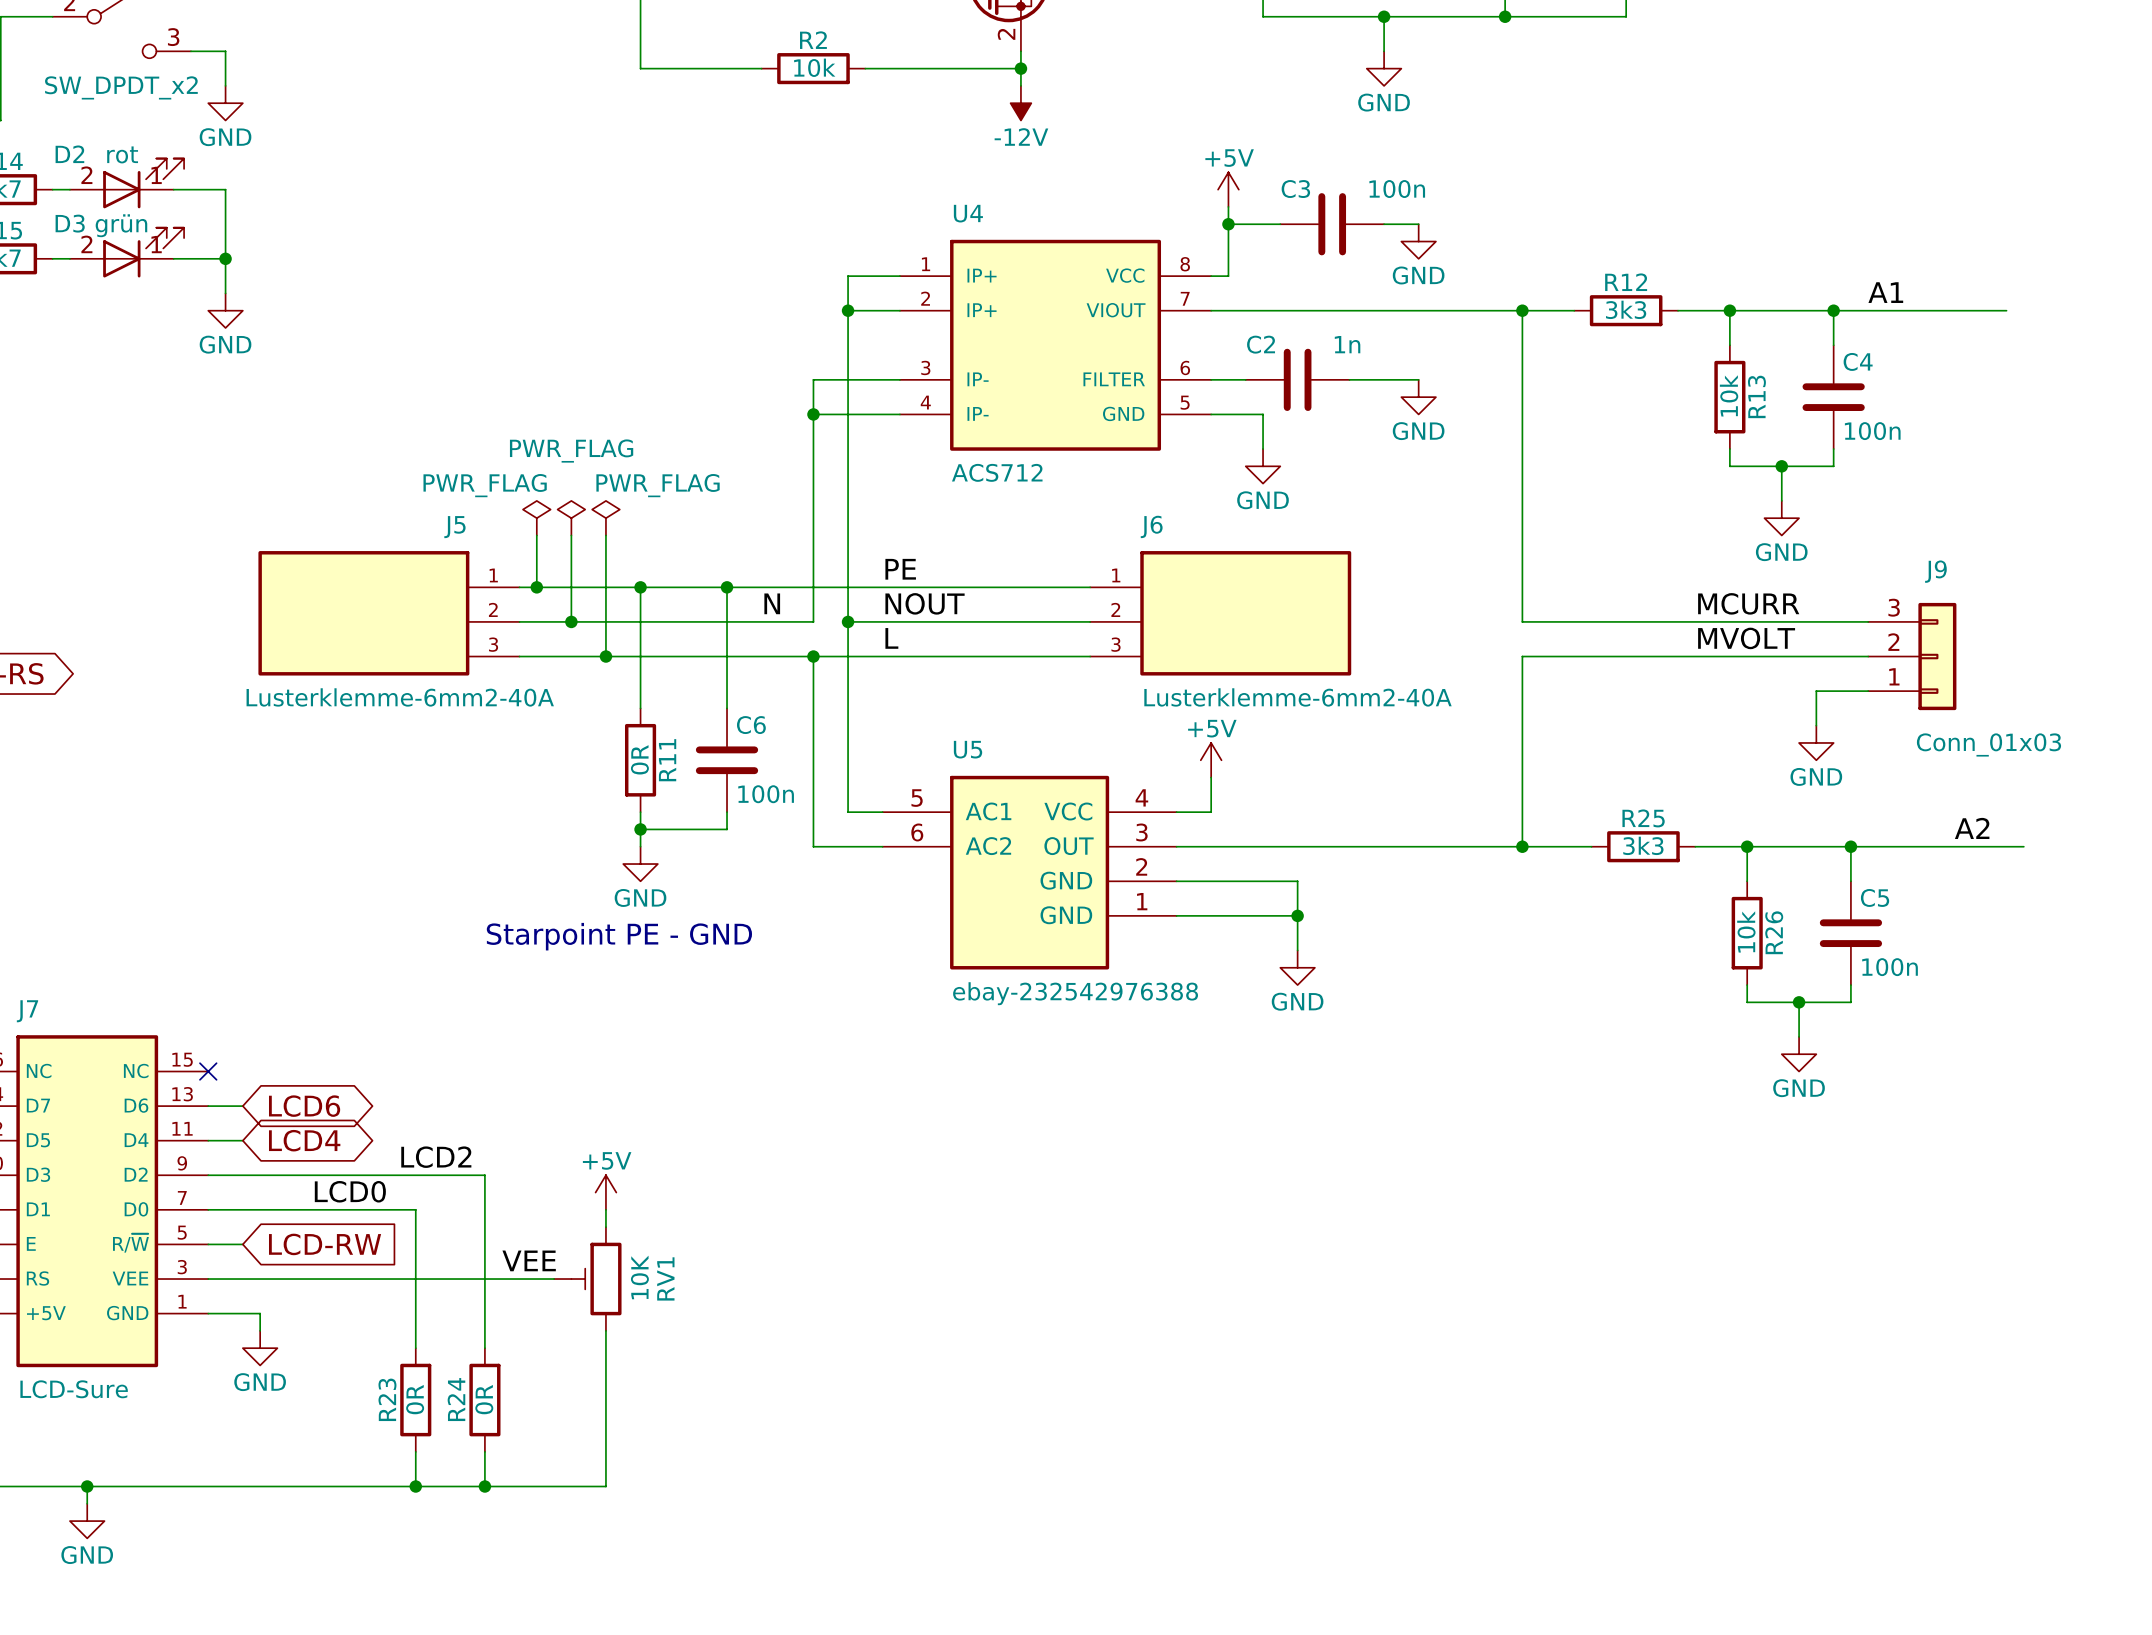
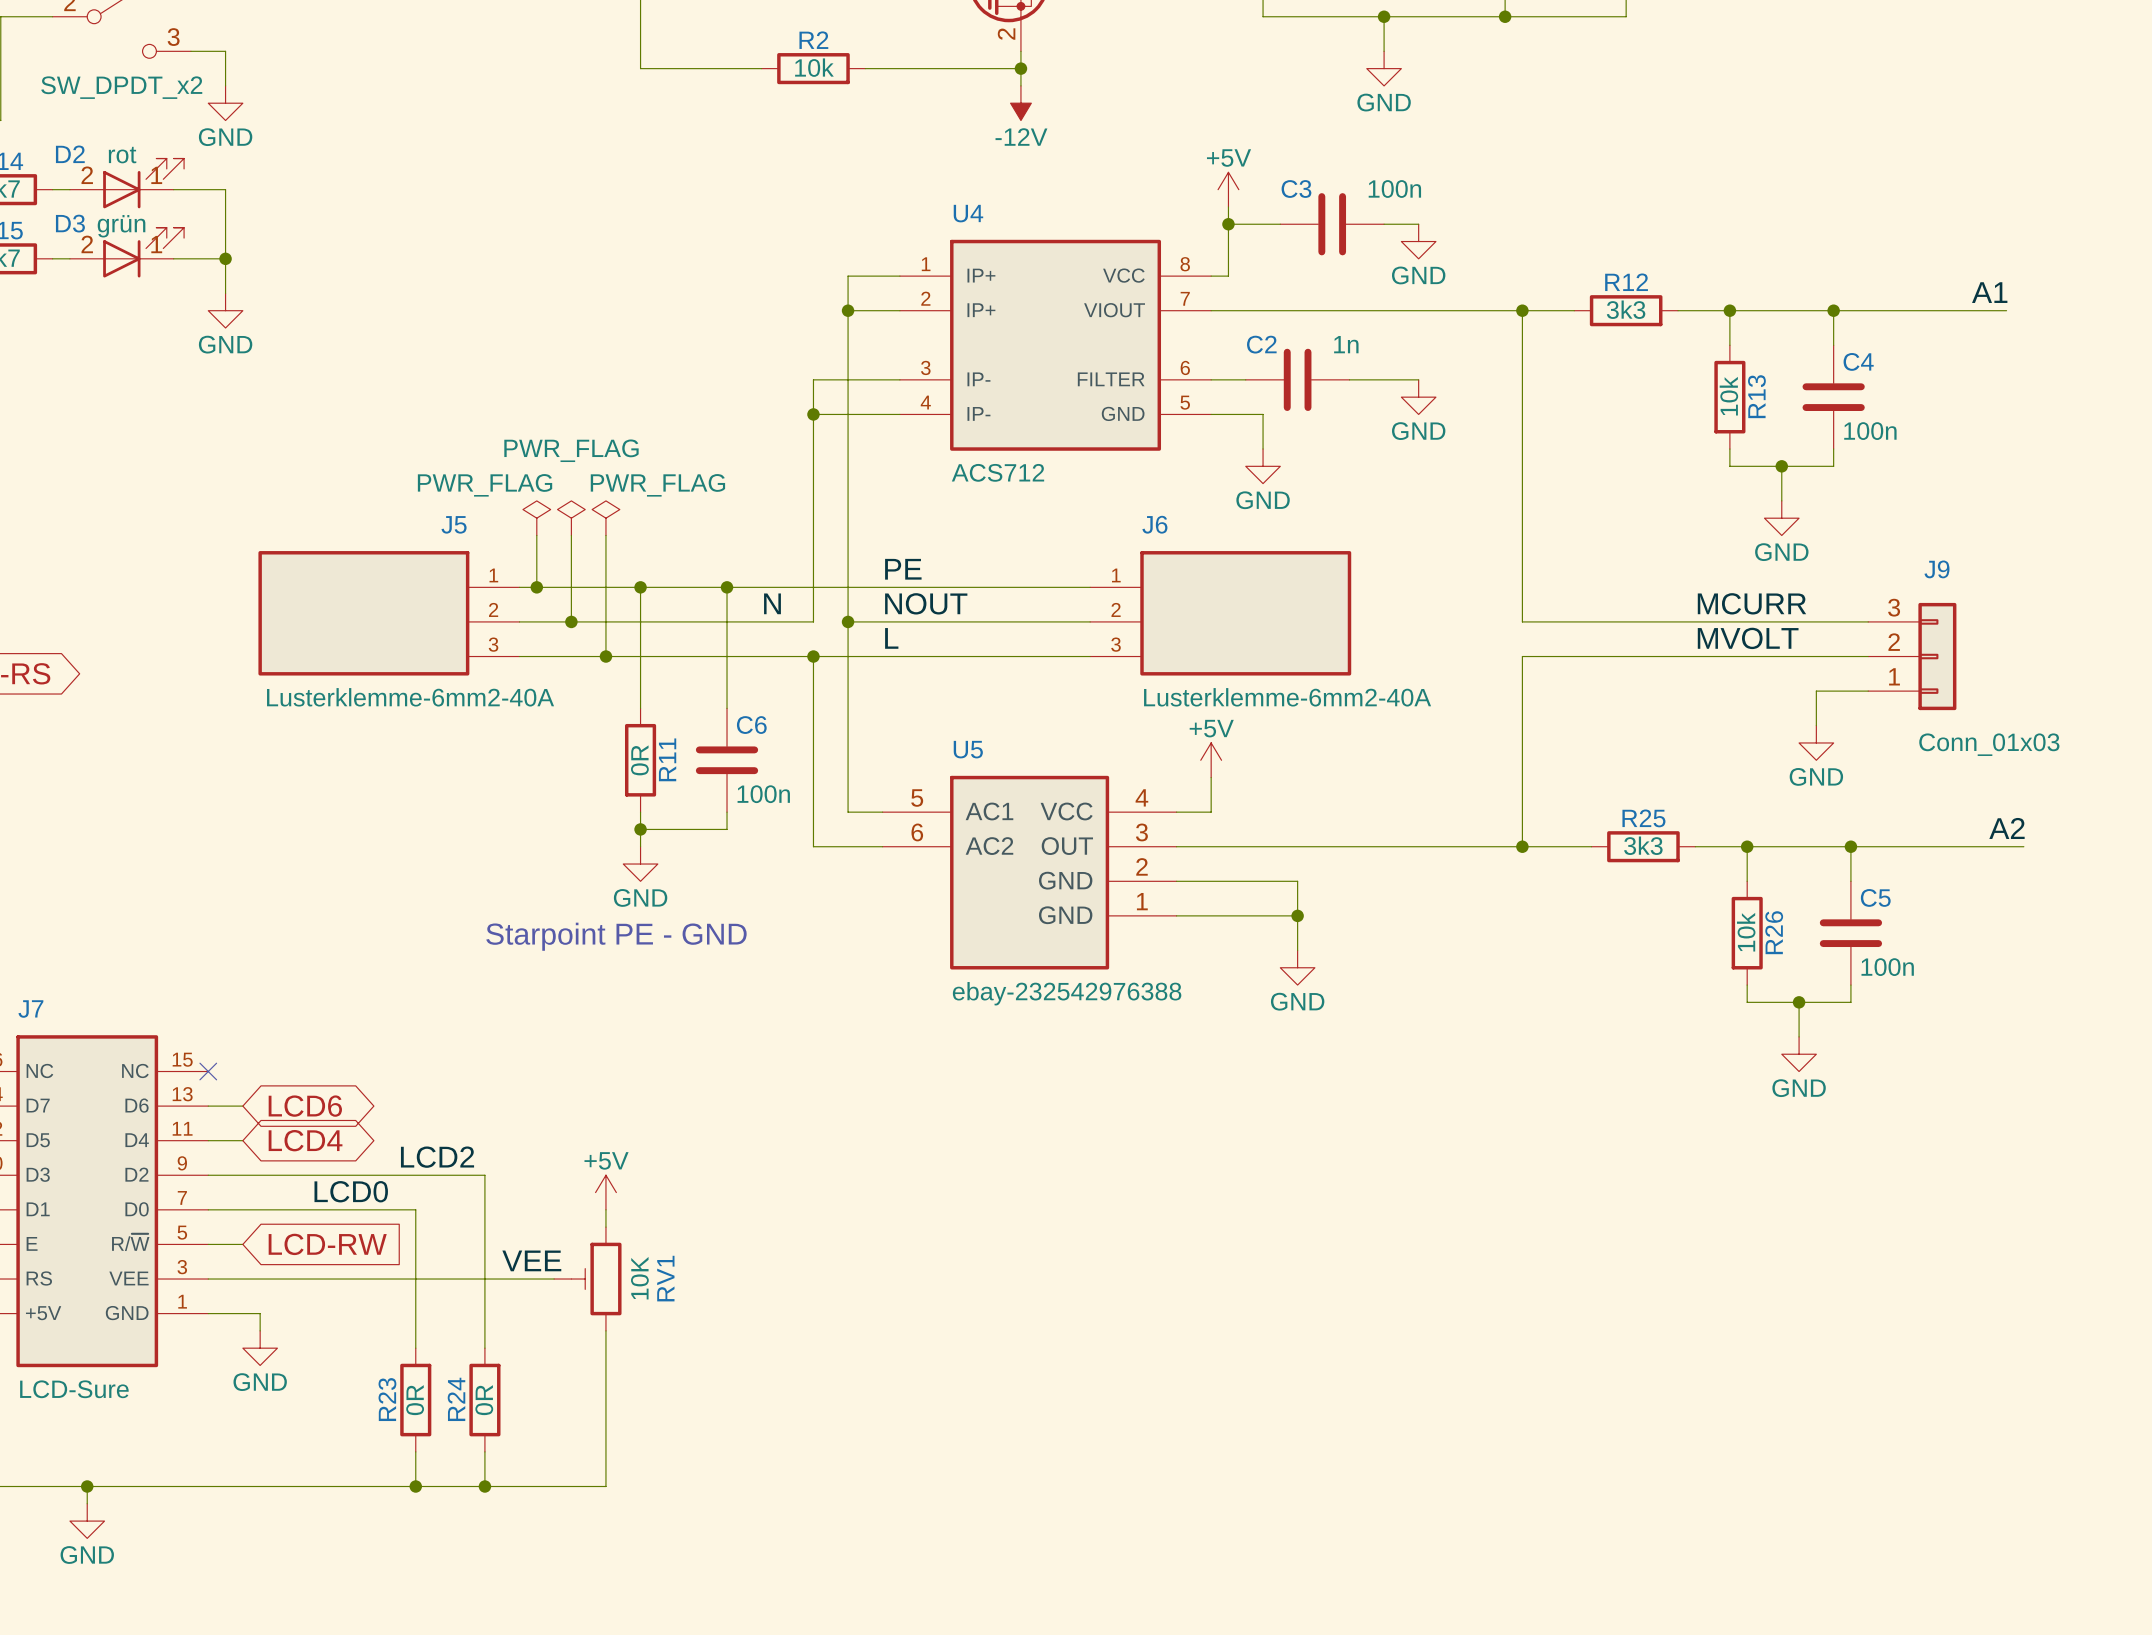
label position: A1 (1885, 292) -> A1 (1989, 292)
label position: A2 (1972, 828) -> A2 (2006, 828)

